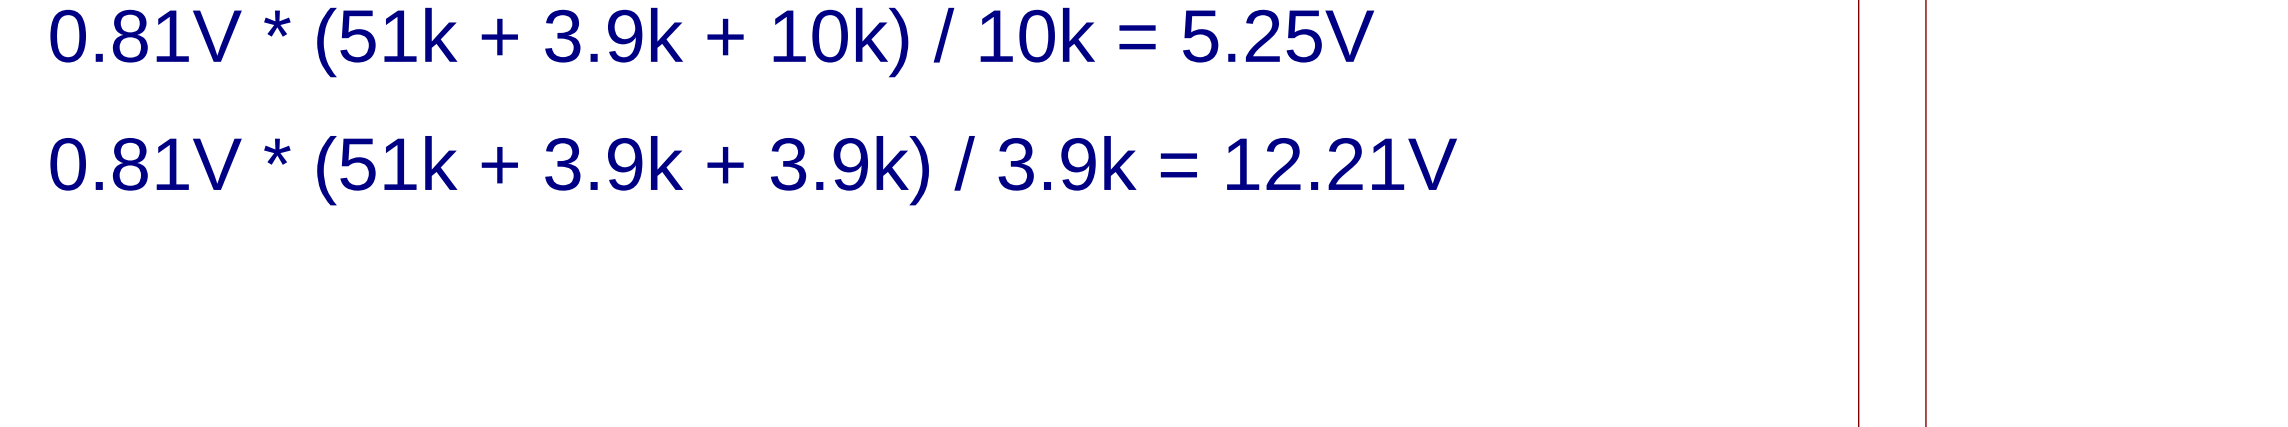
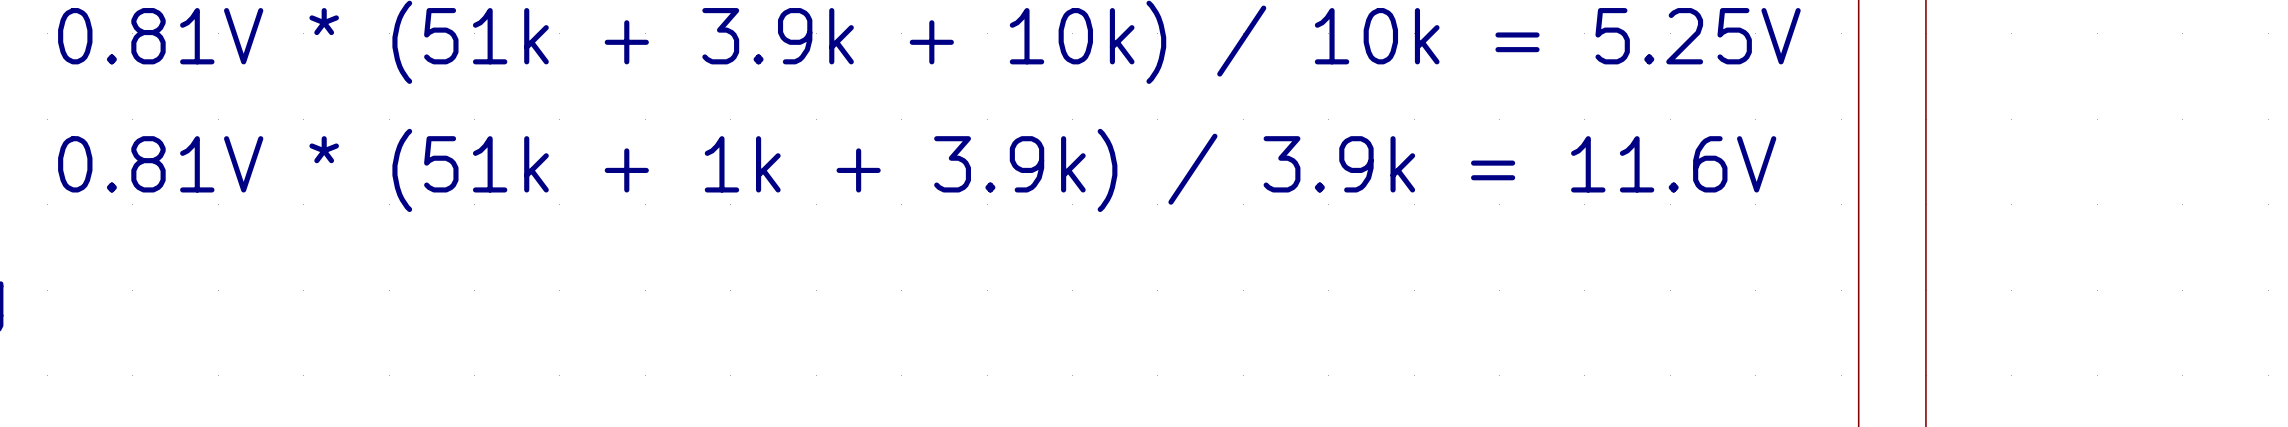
text: 0.81V * (51k + 3.9k + 3.9k) / 3.9k = 12.21V (753, 170) -> 0.81V * (51k + 1k + 3.9k) / 3.9k = 11.6V (917, 170)

